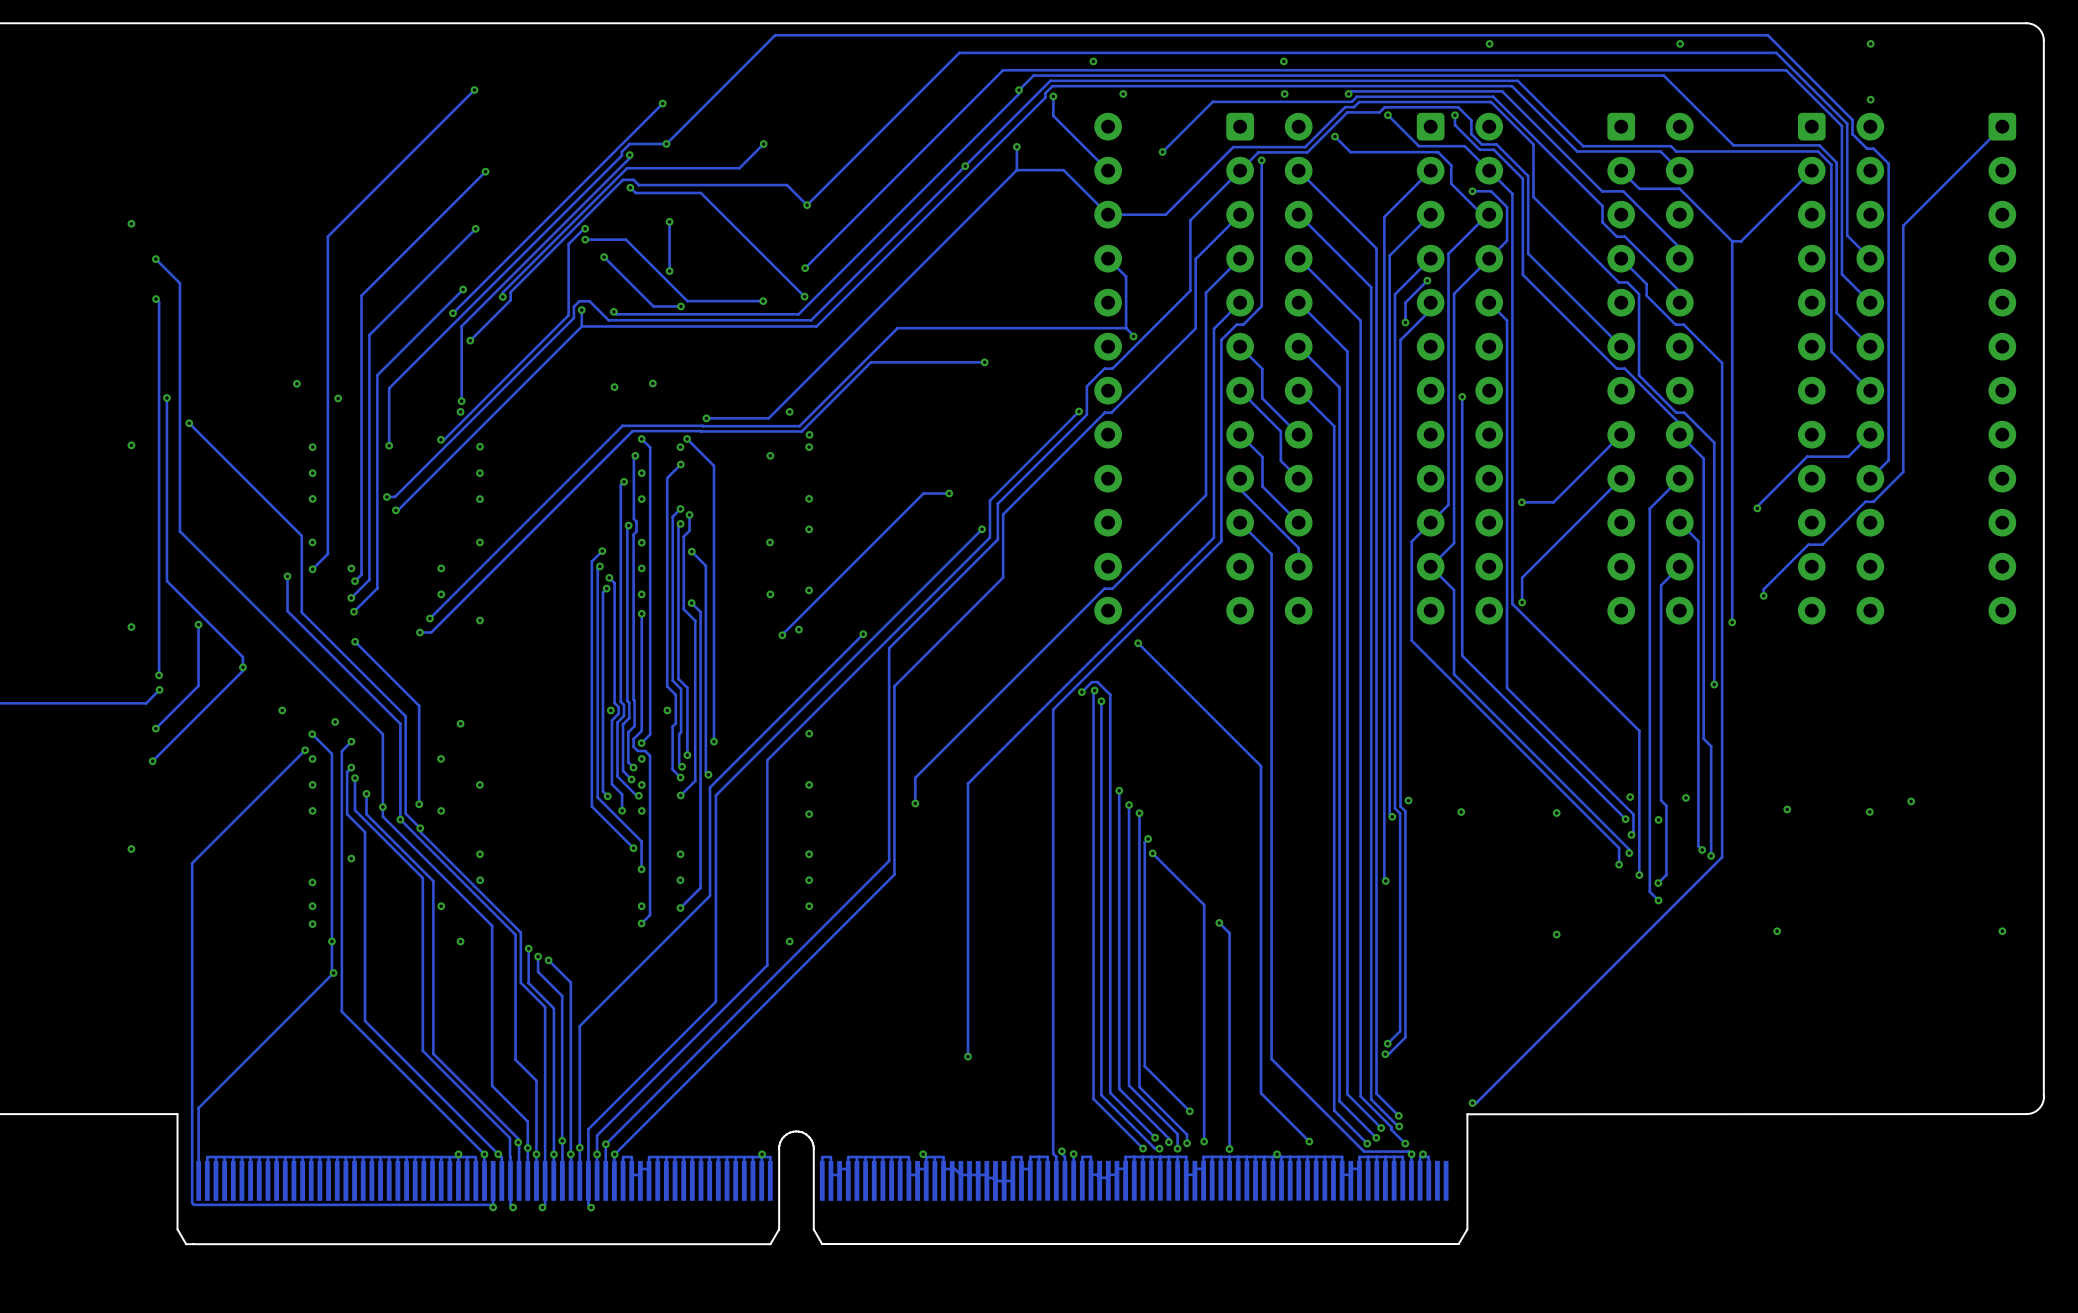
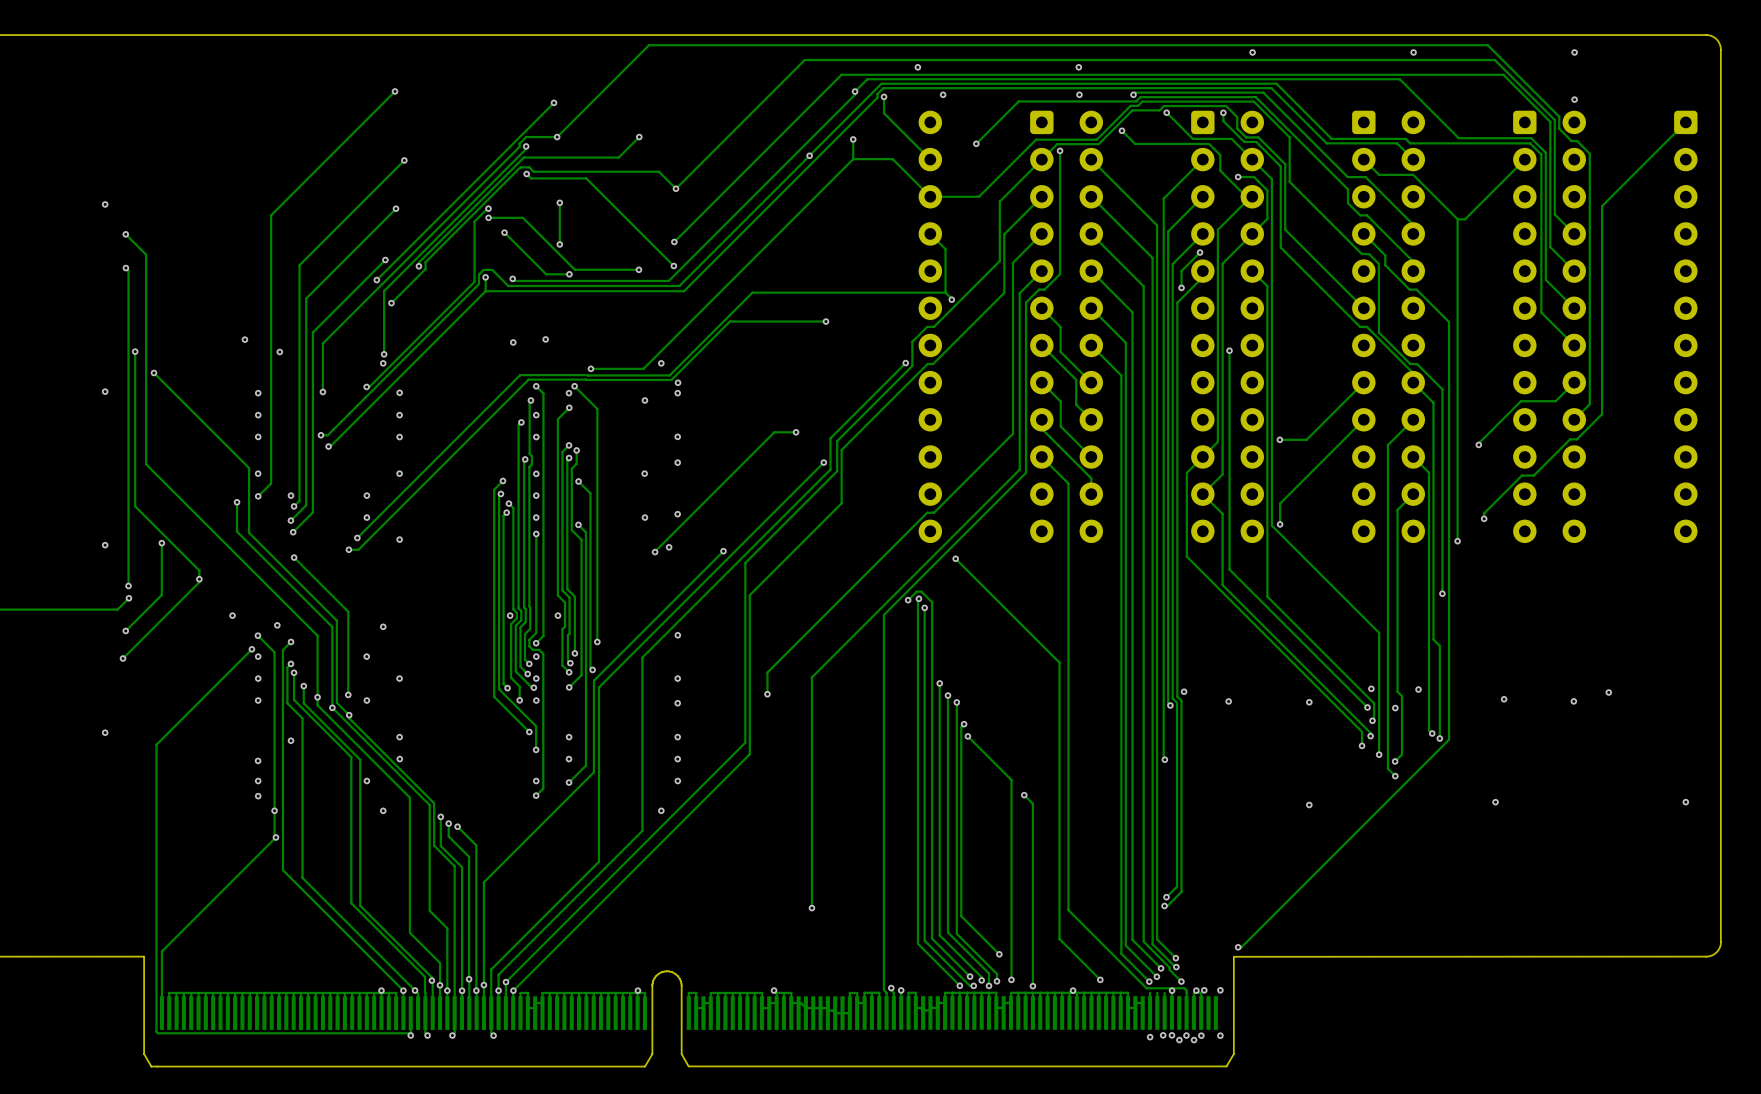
via: none -> (1204, 990)
via: none -> (1220, 990)
via: none -> (1172, 990)
via: (1411, 1154) -> none
track: (1402, 1180) (1402, 1156) (1359, 1156) (1359, 1180) -> none
via: none -> (1163, 1035)
via: none -> (1171, 1035)
via: none -> (1186, 1035)
via: none -> (1201, 1035)
via: none -> (1220, 1035)
via: none -> (1150, 1037)
via: none -> (1179, 1040)
via: none -> (1194, 1040)

